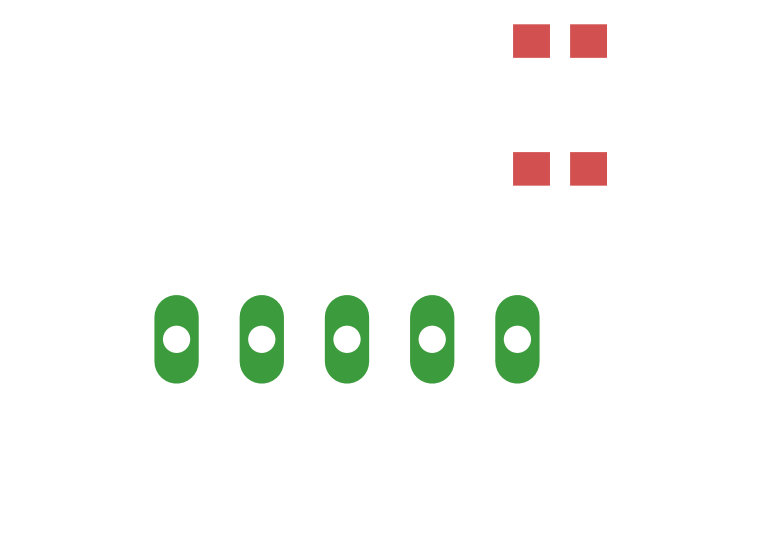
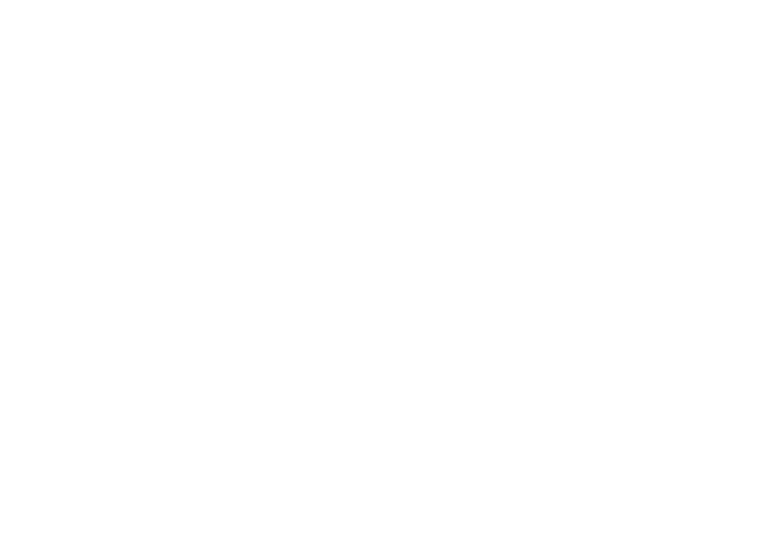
part: (560, 41) -> none
part: (560, 168) -> none
part: (347, 339) -> none

